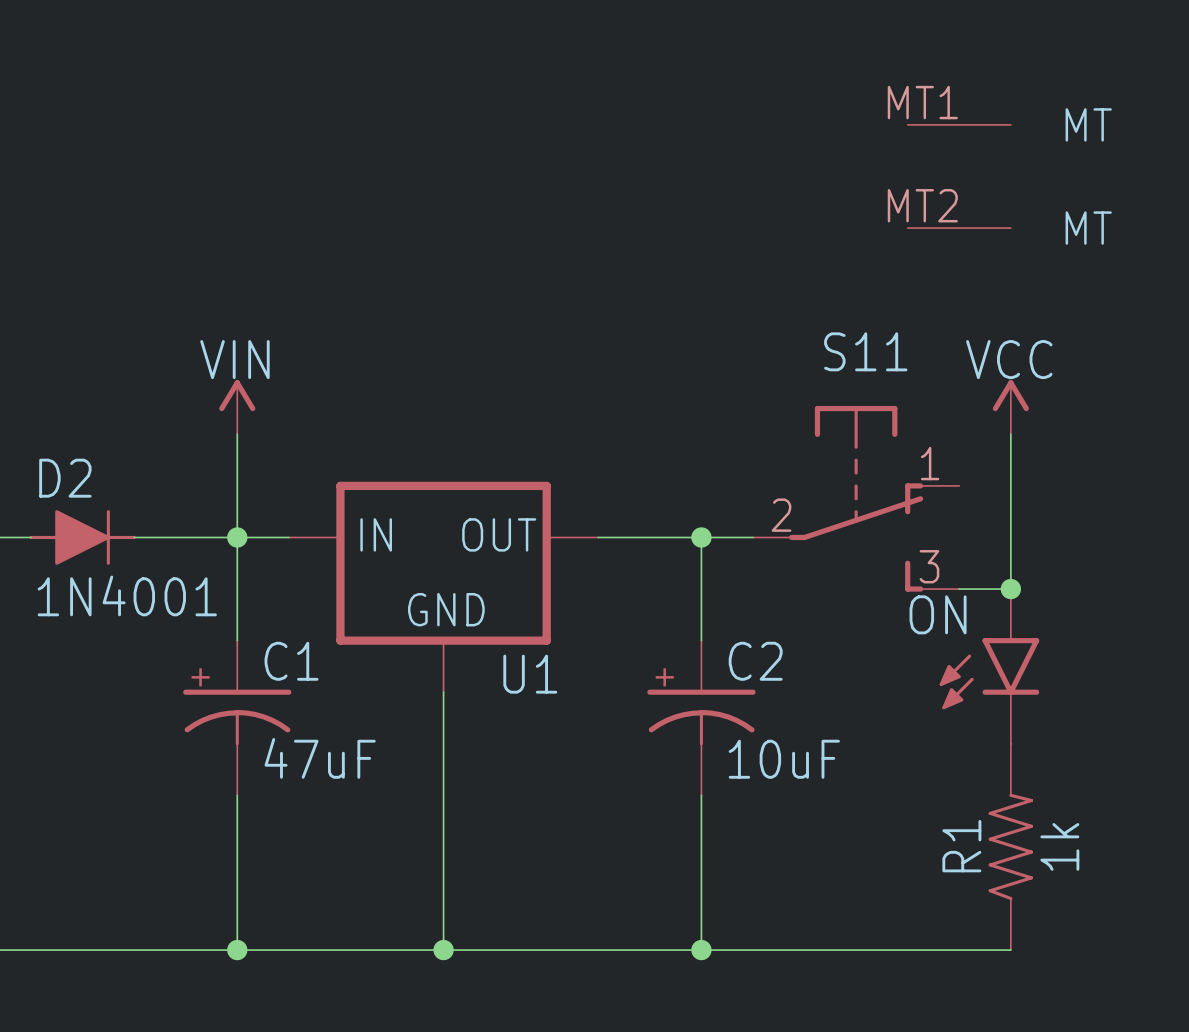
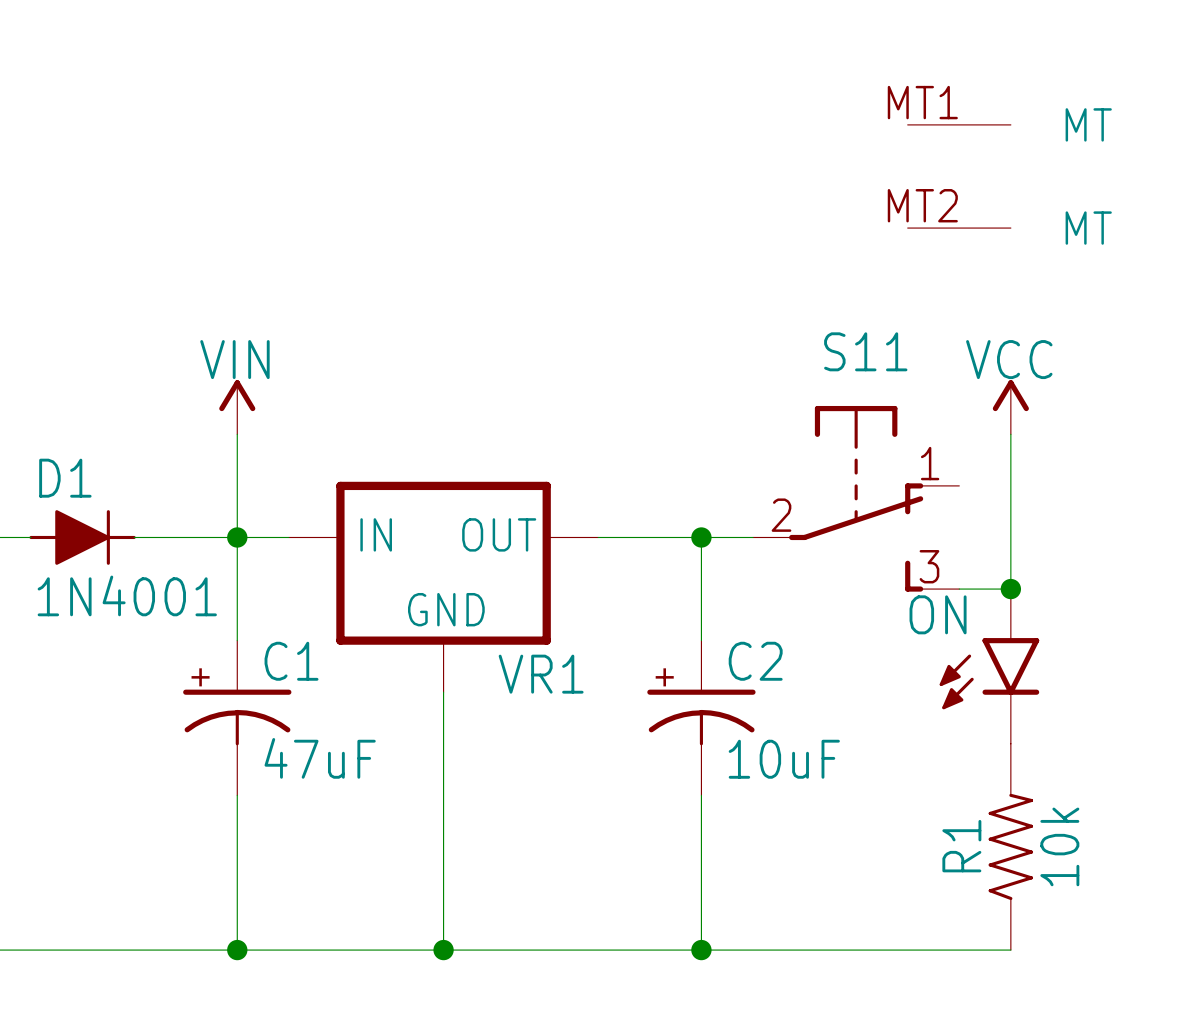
D2 name: D2 (65, 478) -> D1 (65, 478)
U1 name: U1 (530, 674) -> VR1 (541, 674)
R1 value: 1k (1059, 846) -> 10k (1059, 846)

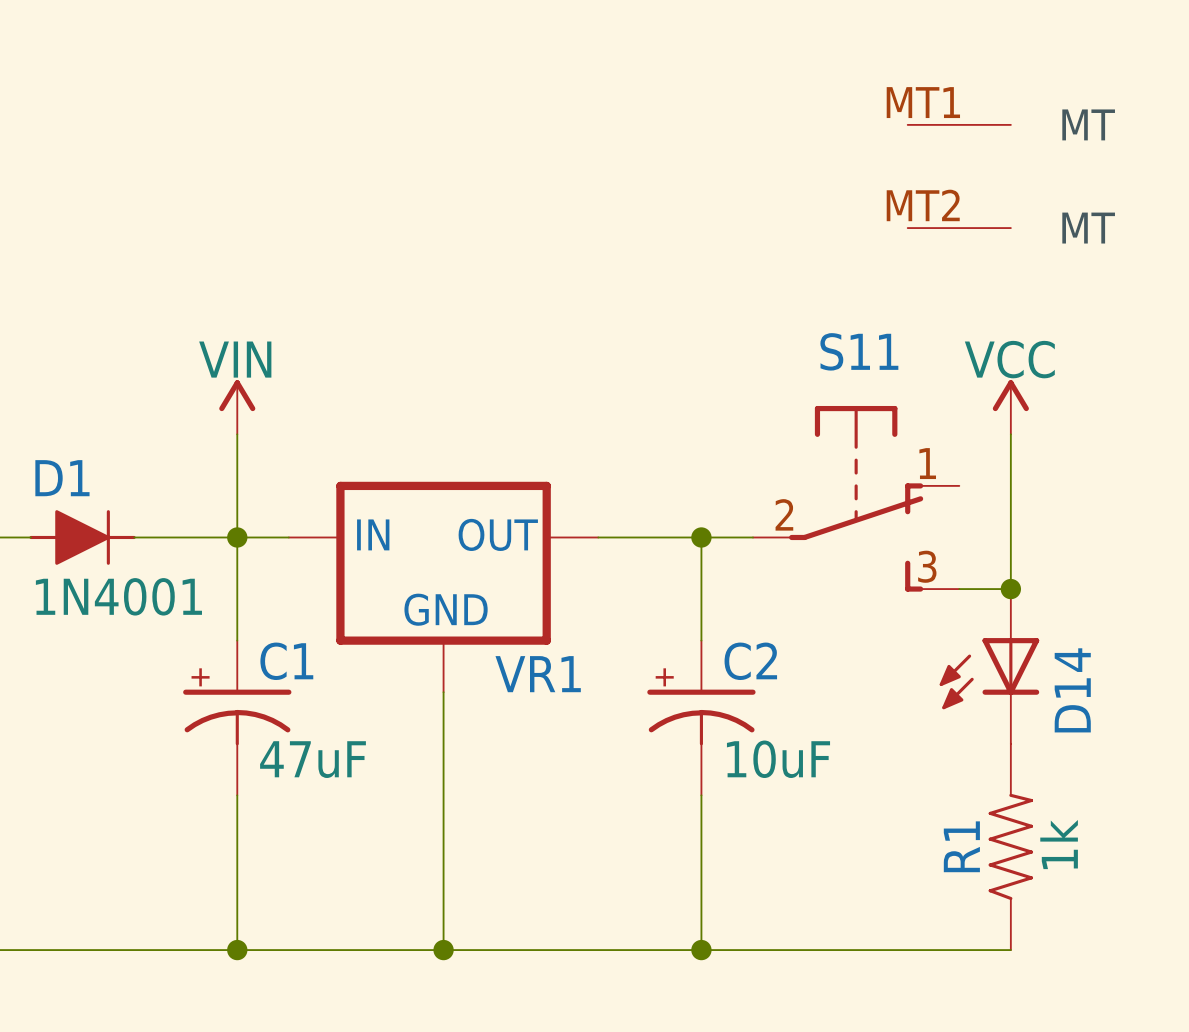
ON: (989, 666) -> none
D14: none -> (989, 666)
R1 value: 10k (1059, 846) -> 1k (1059, 844)

